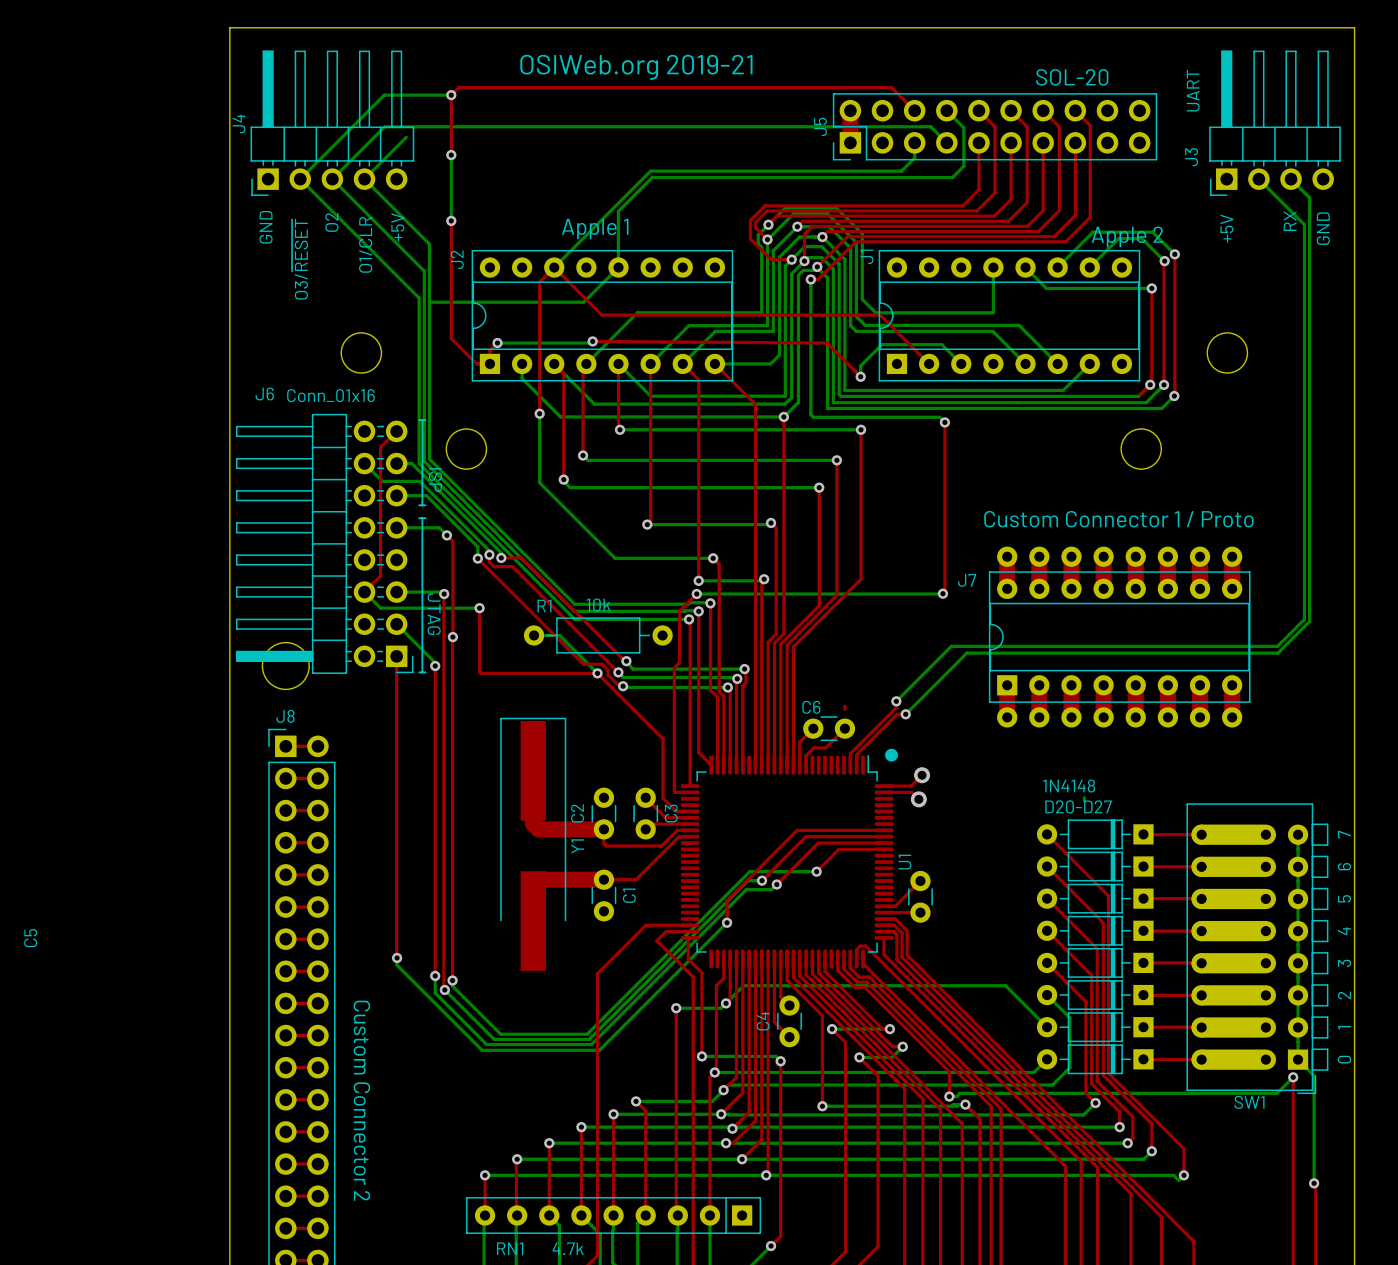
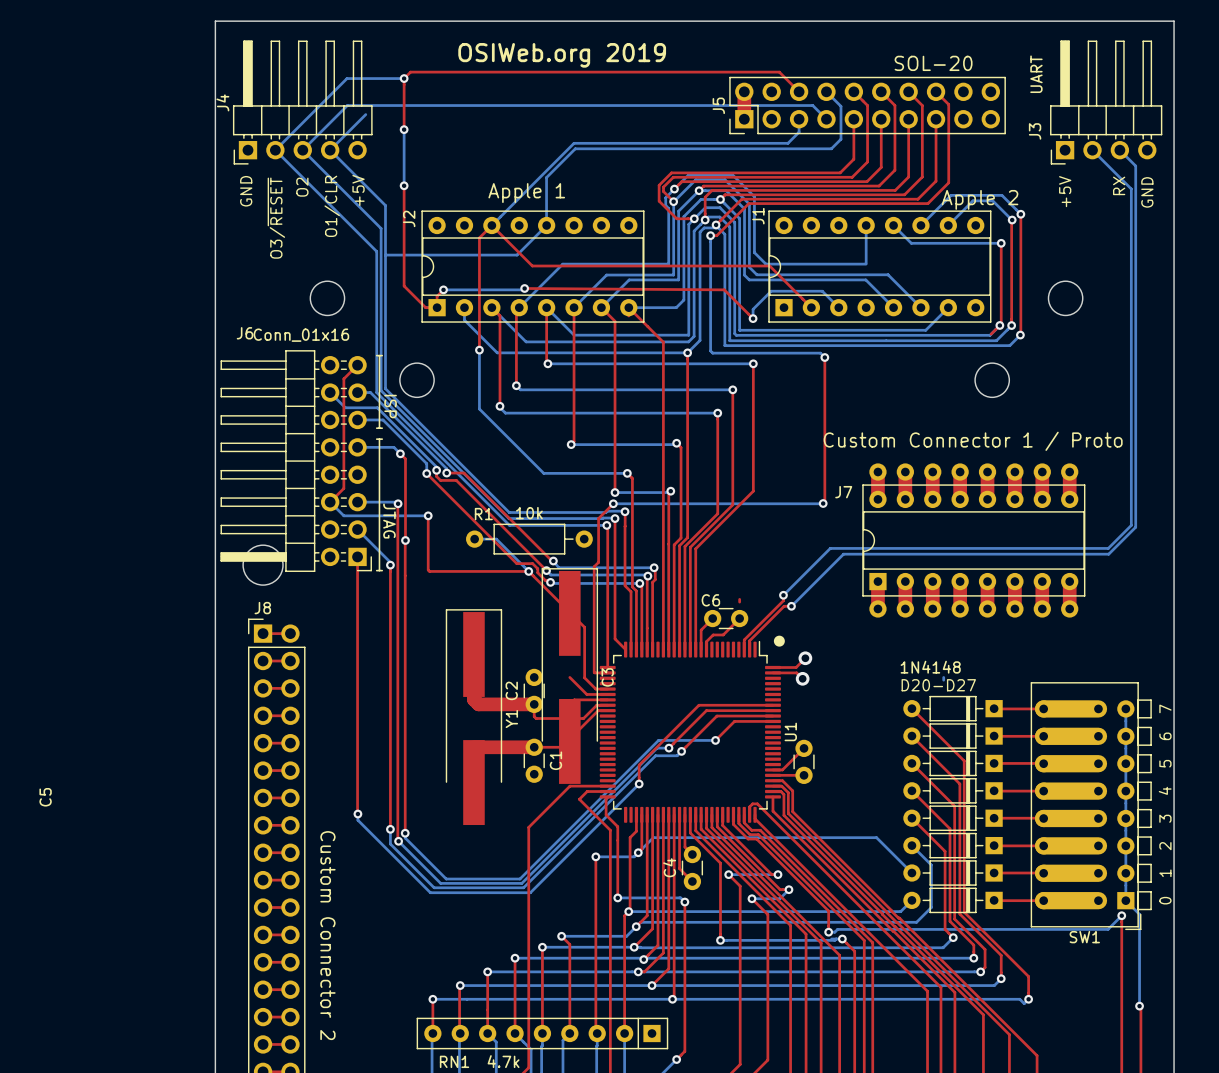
text: OSIWeb.org 2019-21 (636, 67) -> OSIWeb.org 2019 (562, 55)
C3 footprint: [633, 787, 659, 840] -> [541, 568, 598, 784]

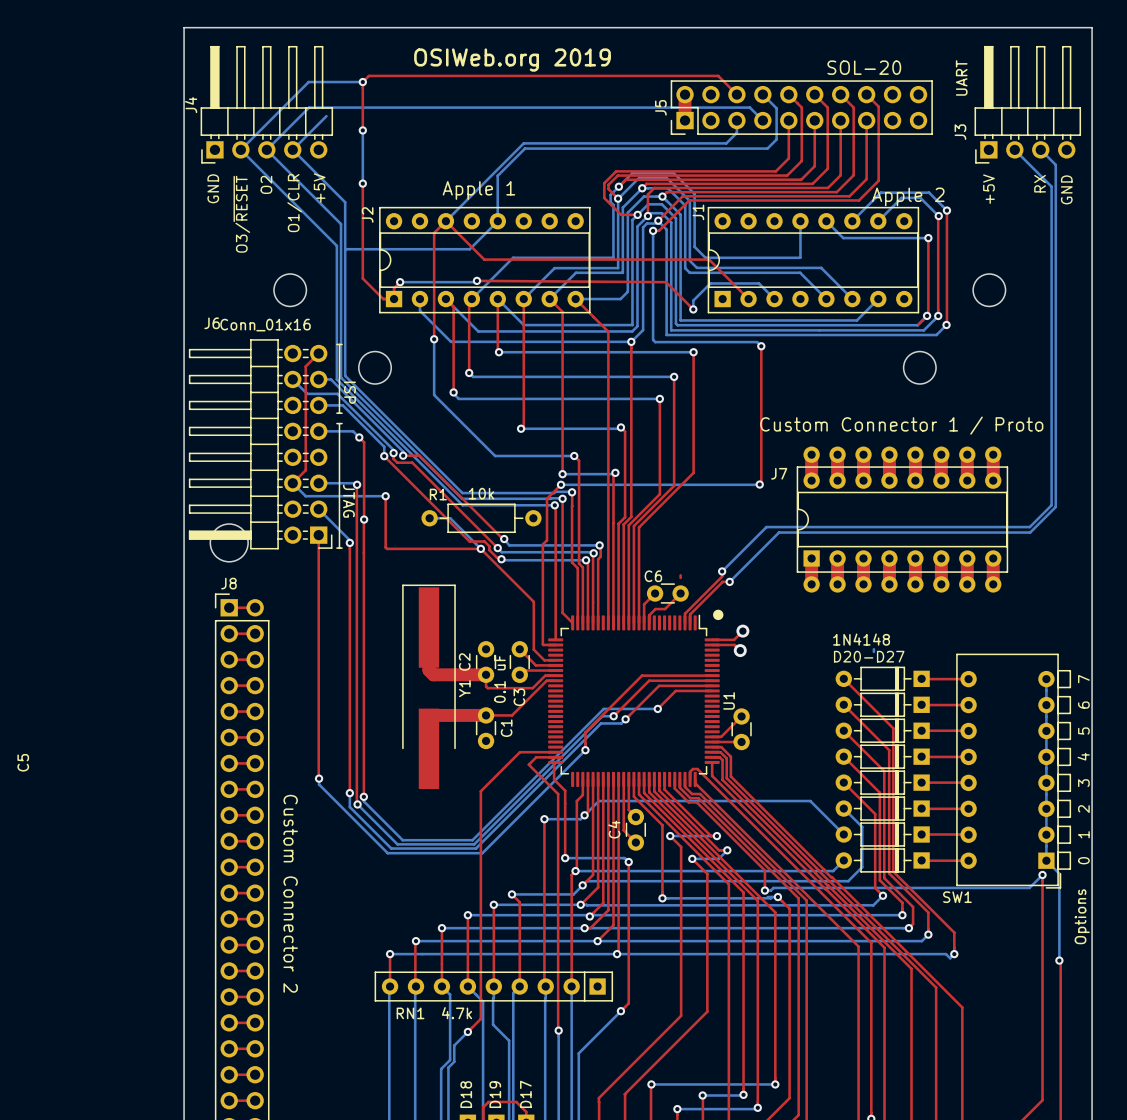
C3 footprint: [541, 568, 598, 784] -> [509, 641, 530, 683]
C3 name position: C3 (607, 677) -> C3 (519, 697)
SW1 footprint: [1030, 682, 1152, 930] -> [956, 653, 1071, 889]
C3 value: none -> 0.1 uF (499, 678)
SW1 name position: SW1 (1084, 937) -> SW1 (957, 897)
SW1 value: none -> Options (1082, 916)

